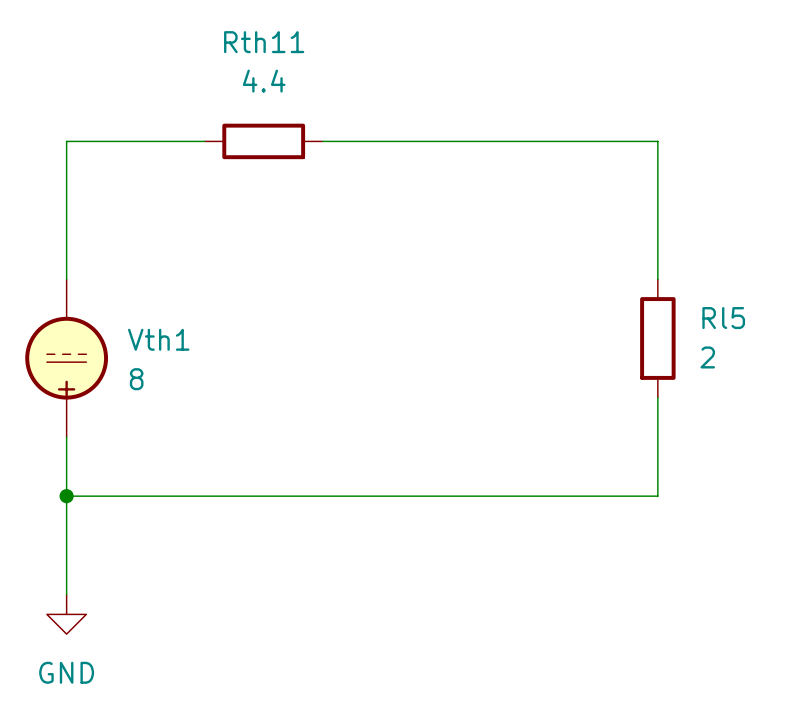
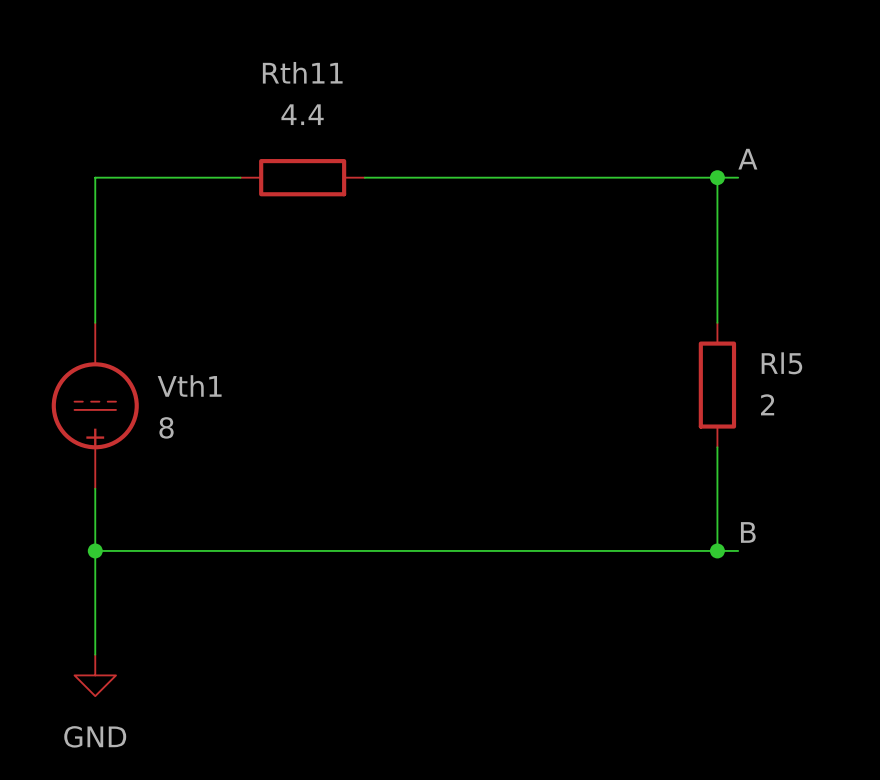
label: none -> A (747, 159)
wire: none -> (717, 177) (738, 177)
junction: none -> (717, 177)
label: none -> B (748, 532)
wire: none -> (717, 550) (738, 550)
junction: none -> (717, 550)

